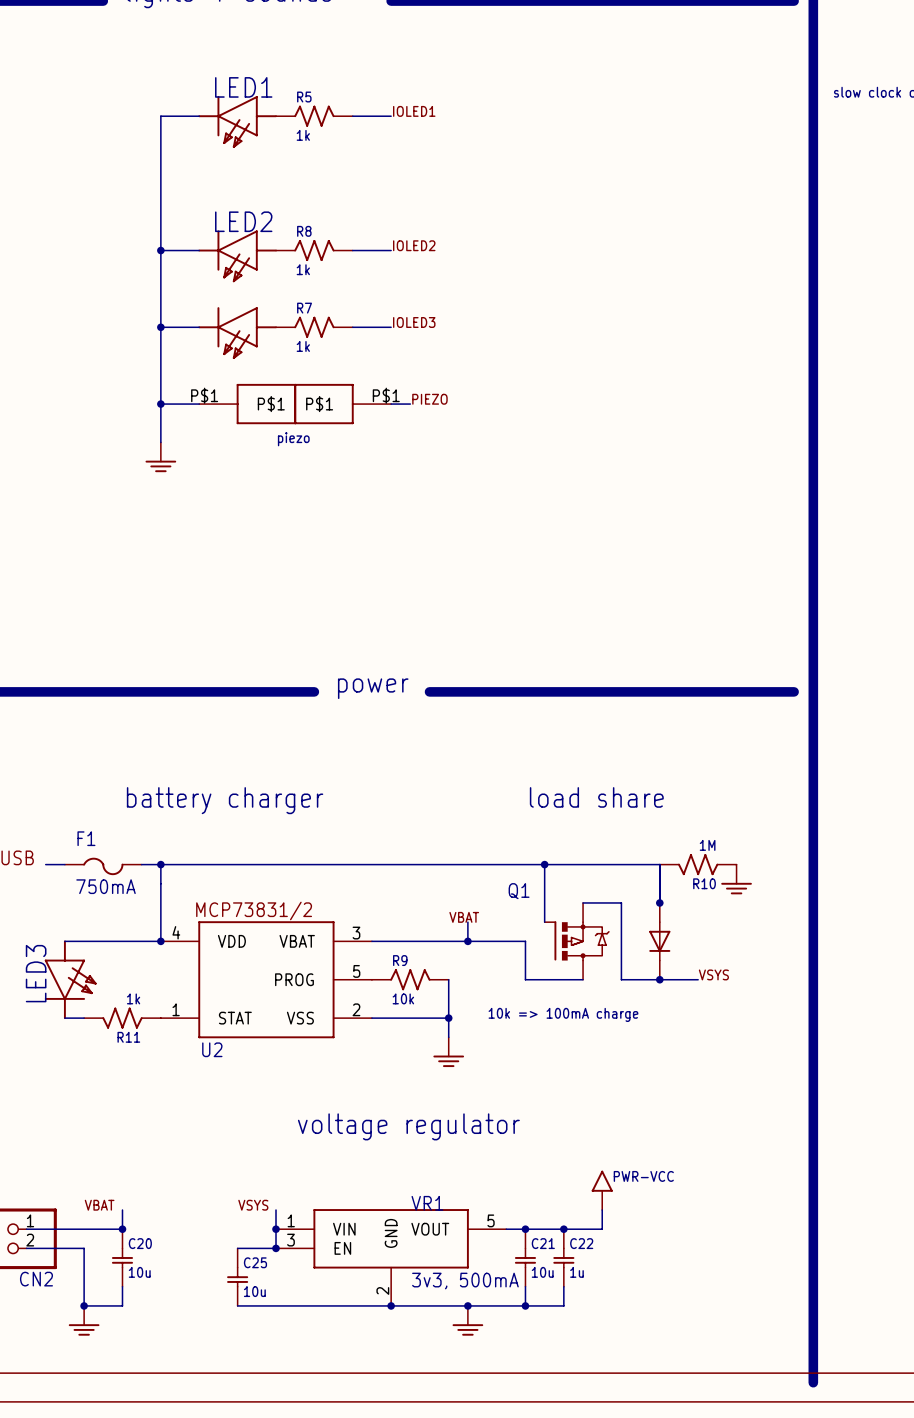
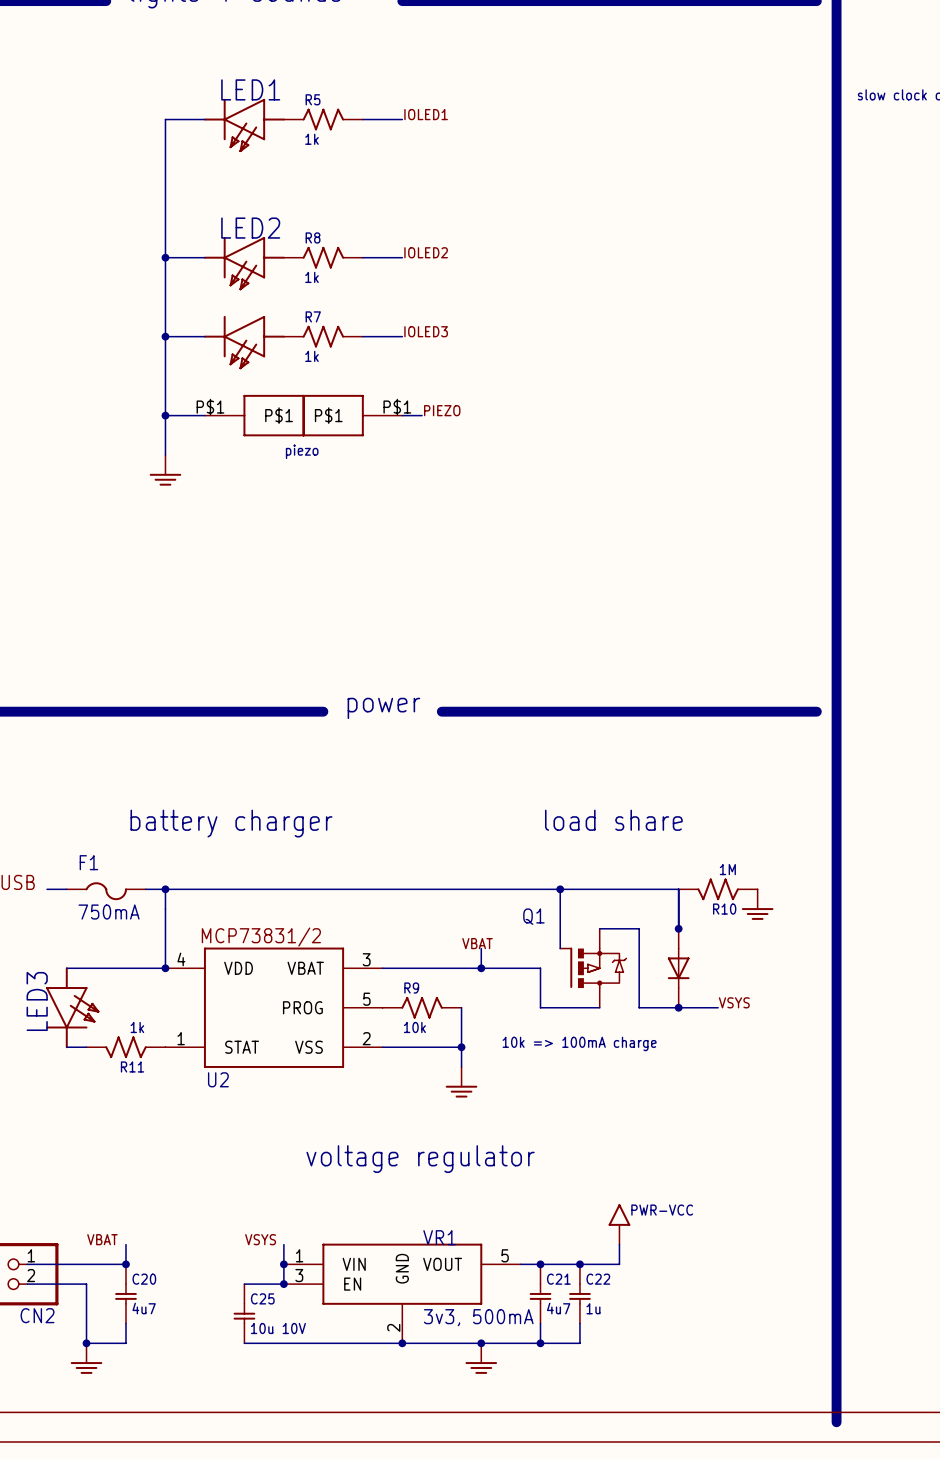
C20 value: 10u (139, 1272) -> 4u7 (144, 1308)
C21 value: 10u (542, 1272) -> 4u7 (558, 1308)
C25 value: 10u (254, 1291) -> 10u 10V (278, 1328)

